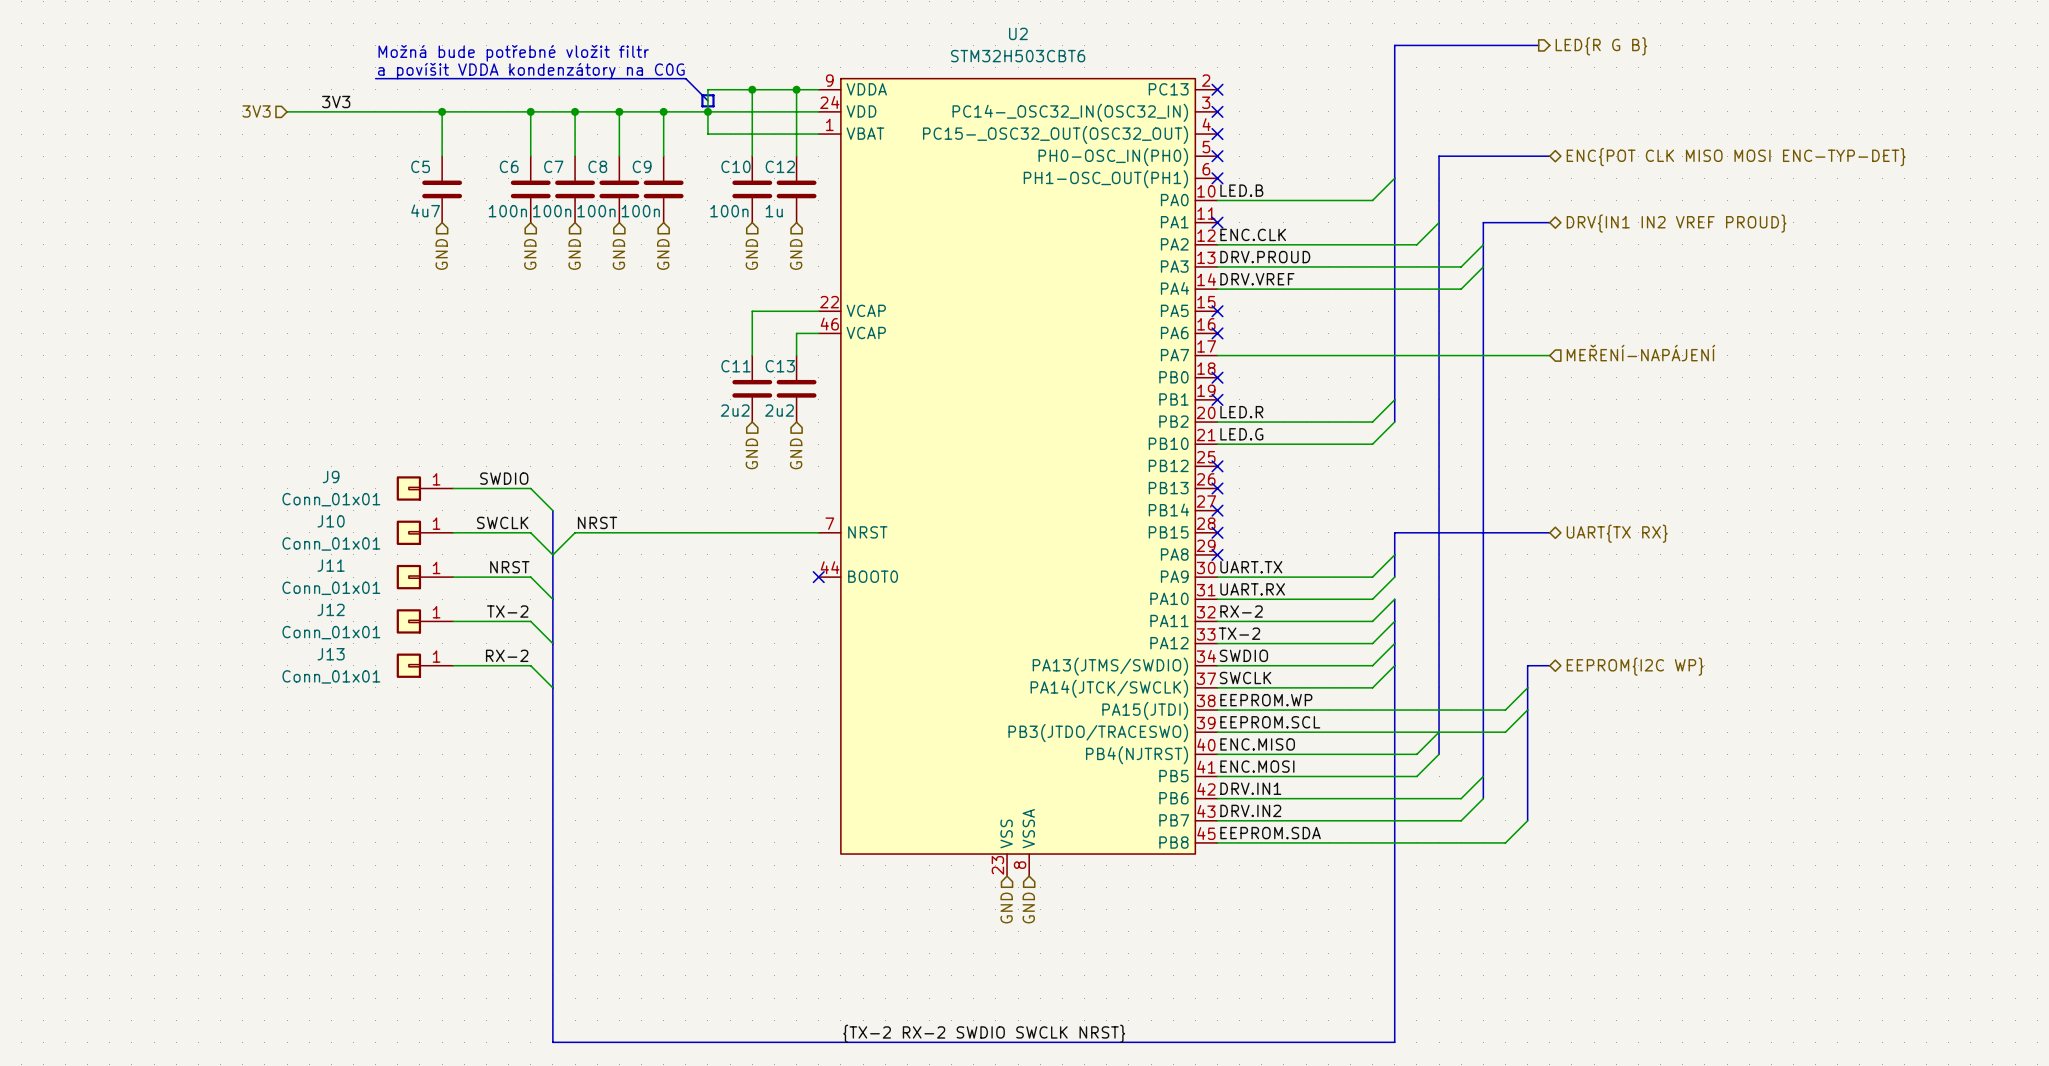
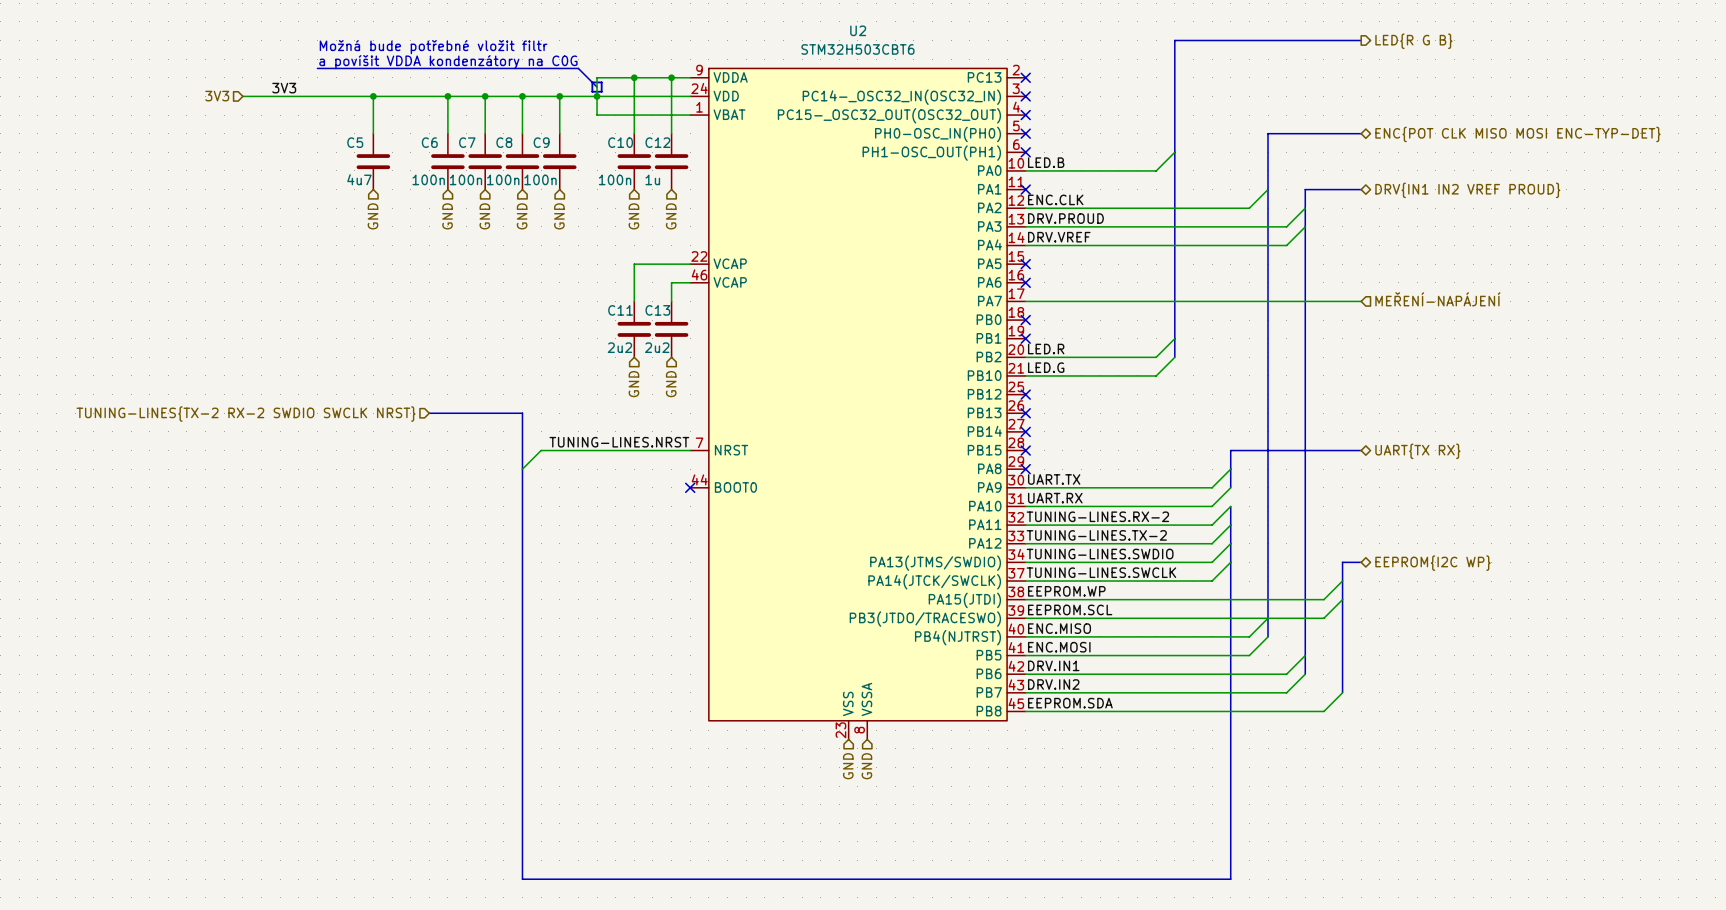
bus: none -> (1295, 40) (1361, 40)
hierarchical label position: LED{R G B} (1601, 46) -> LED{R G B} (1413, 41)
bus: (1505, 156) (1439, 156) (1439, 754) -> (1268, 133) (1268, 636)
bus: none -> (1305, 133) (1361, 133)
hierarchical label position: ENC{POT CLK MISO MOSI ENC-TYP-DET} (1736, 157) -> ENC{POT CLK MISO MOSI ENC-TYP-DET} (1517, 134)
wire: (1439, 222) (1416, 244) -> (1268, 189) (1249, 208) (1193, 208)
bus: (1549, 222) (1483, 222) (1483, 798) -> (1361, 189) (1305, 189) (1305, 674)
hierarchical label position: DRV{IN1 IN2 VREF PROUD} (1676, 223) -> DRV{IN1 IN2 VREF PROUD} (1467, 190)
wire: (1483, 244) (1461, 266) -> (1305, 208) (1286, 226) (1230, 226)
wire: (1483, 266) (1461, 289) -> (1305, 226) (1286, 245) (1230, 245)
hierarchical label position: MEŘENÍ-NAPÁJENÍ (1640, 353) -> MEŘENÍ-NAPÁJENÍ (1437, 299)
wire: none -> (1305, 301) (1361, 301)
label: SWDIO (504, 478) -> none
J9: Conn_01x01 (424, 488) -> none
wire: (453, 488) (530, 488) (552, 510) -> none
hierarchical label: none -> TUNING-LINES{TX-2 RX-2 SWDIO SWCLK NRST} (246, 414)
bus: (552, 510) (552, 1042) (619, 1042) -> (429, 413) (522, 413) (522, 879)
label: SWCLK (502, 522) -> none
label: NRST (597, 522) -> none
label: none -> TUNING-LINES.NRST (619, 442)
J10: Conn_01x01 (424, 532) -> none
wire: (453, 532) (530, 532) (552, 554) (575, 532) (641, 532) -> (522, 469) (541, 450)
bus: (1461, 532) (1394, 532) (1394, 577) -> (1230, 450) (1230, 487)
bus: none -> (1305, 450) (1361, 450)
hierarchical label position: UART{TX RX} (1617, 533) -> UART{TX RX} (1417, 451)
wire: (1394, 554) (1372, 577) -> (1230, 469) (1212, 487) (1156, 487)
label: NRST (509, 567) -> none
J11: Conn_01x01 (424, 577) -> none
wire: (453, 577) (530, 577) (552, 599) -> none
wire: (1394, 577) (1372, 599) -> (1230, 487) (1212, 506) (1156, 506)
wire: (1394, 599) (1372, 621) -> (1230, 506) (1212, 525) (1156, 525)
bus: (1394, 599) (1394, 1042) -> (1230, 506) (1230, 879) (1174, 879)
label: TX-2 (507, 611) -> none
label: RX-2 (1241, 611) -> TUNING-LINES.RX-2 (1097, 516)
J12: Conn_01x01 (424, 621) -> none
wire: (453, 621) (530, 621) (552, 643) -> none
wire: (1394, 621) (1372, 643) -> (1230, 525) (1212, 543) (1156, 543)
label: TX-2 (1239, 633) -> TUNING-LINES.TX-2 (1096, 535)
wire: (1394, 643) (1372, 665) -> (1230, 543) (1212, 562) (1156, 562)
label: RX-2 (507, 655) -> none
label: SWDIO (1243, 655) -> TUNING-LINES.SWDIO (1100, 554)
J13: Conn_01x01 (424, 665) -> none
wire: (453, 665) (530, 665) (552, 687) -> none
wire: (1394, 665) (1372, 687) -> (1230, 562) (1212, 581) (1156, 581)
bus: (1549, 665) (1527, 665) (1527, 820) -> (1361, 562) (1342, 562) (1342, 692)
hierarchical label position: EEPROM{I2C WP} (1635, 666) -> EEPROM{I2C WP} (1433, 563)
label: SWCLK (1245, 677) -> TUNING-LINES.SWCLK (1101, 572)
wire: (1527, 687) (1505, 710) -> (1342, 581) (1323, 599) (1268, 599)
wire: (1527, 710) (1505, 732) -> none
wire: (1439, 732) (1416, 754) -> (1342, 599) (1323, 618) (1268, 618) (1249, 636) (1193, 636)
wire: (1439, 754) (1416, 776) -> (1268, 636) (1249, 655) (1193, 655)
wire: (1483, 776) (1461, 798) -> (1305, 655) (1286, 674) (1230, 674)
wire: (1483, 798) (1461, 820) -> (1305, 674) (1286, 692) (1230, 692)
wire: (1527, 820) (1505, 842) -> (1342, 692) (1323, 711) (1268, 711)
label: {TX-2 RX-2 SWDIO SWCLK NRST} (984, 1033) -> none

